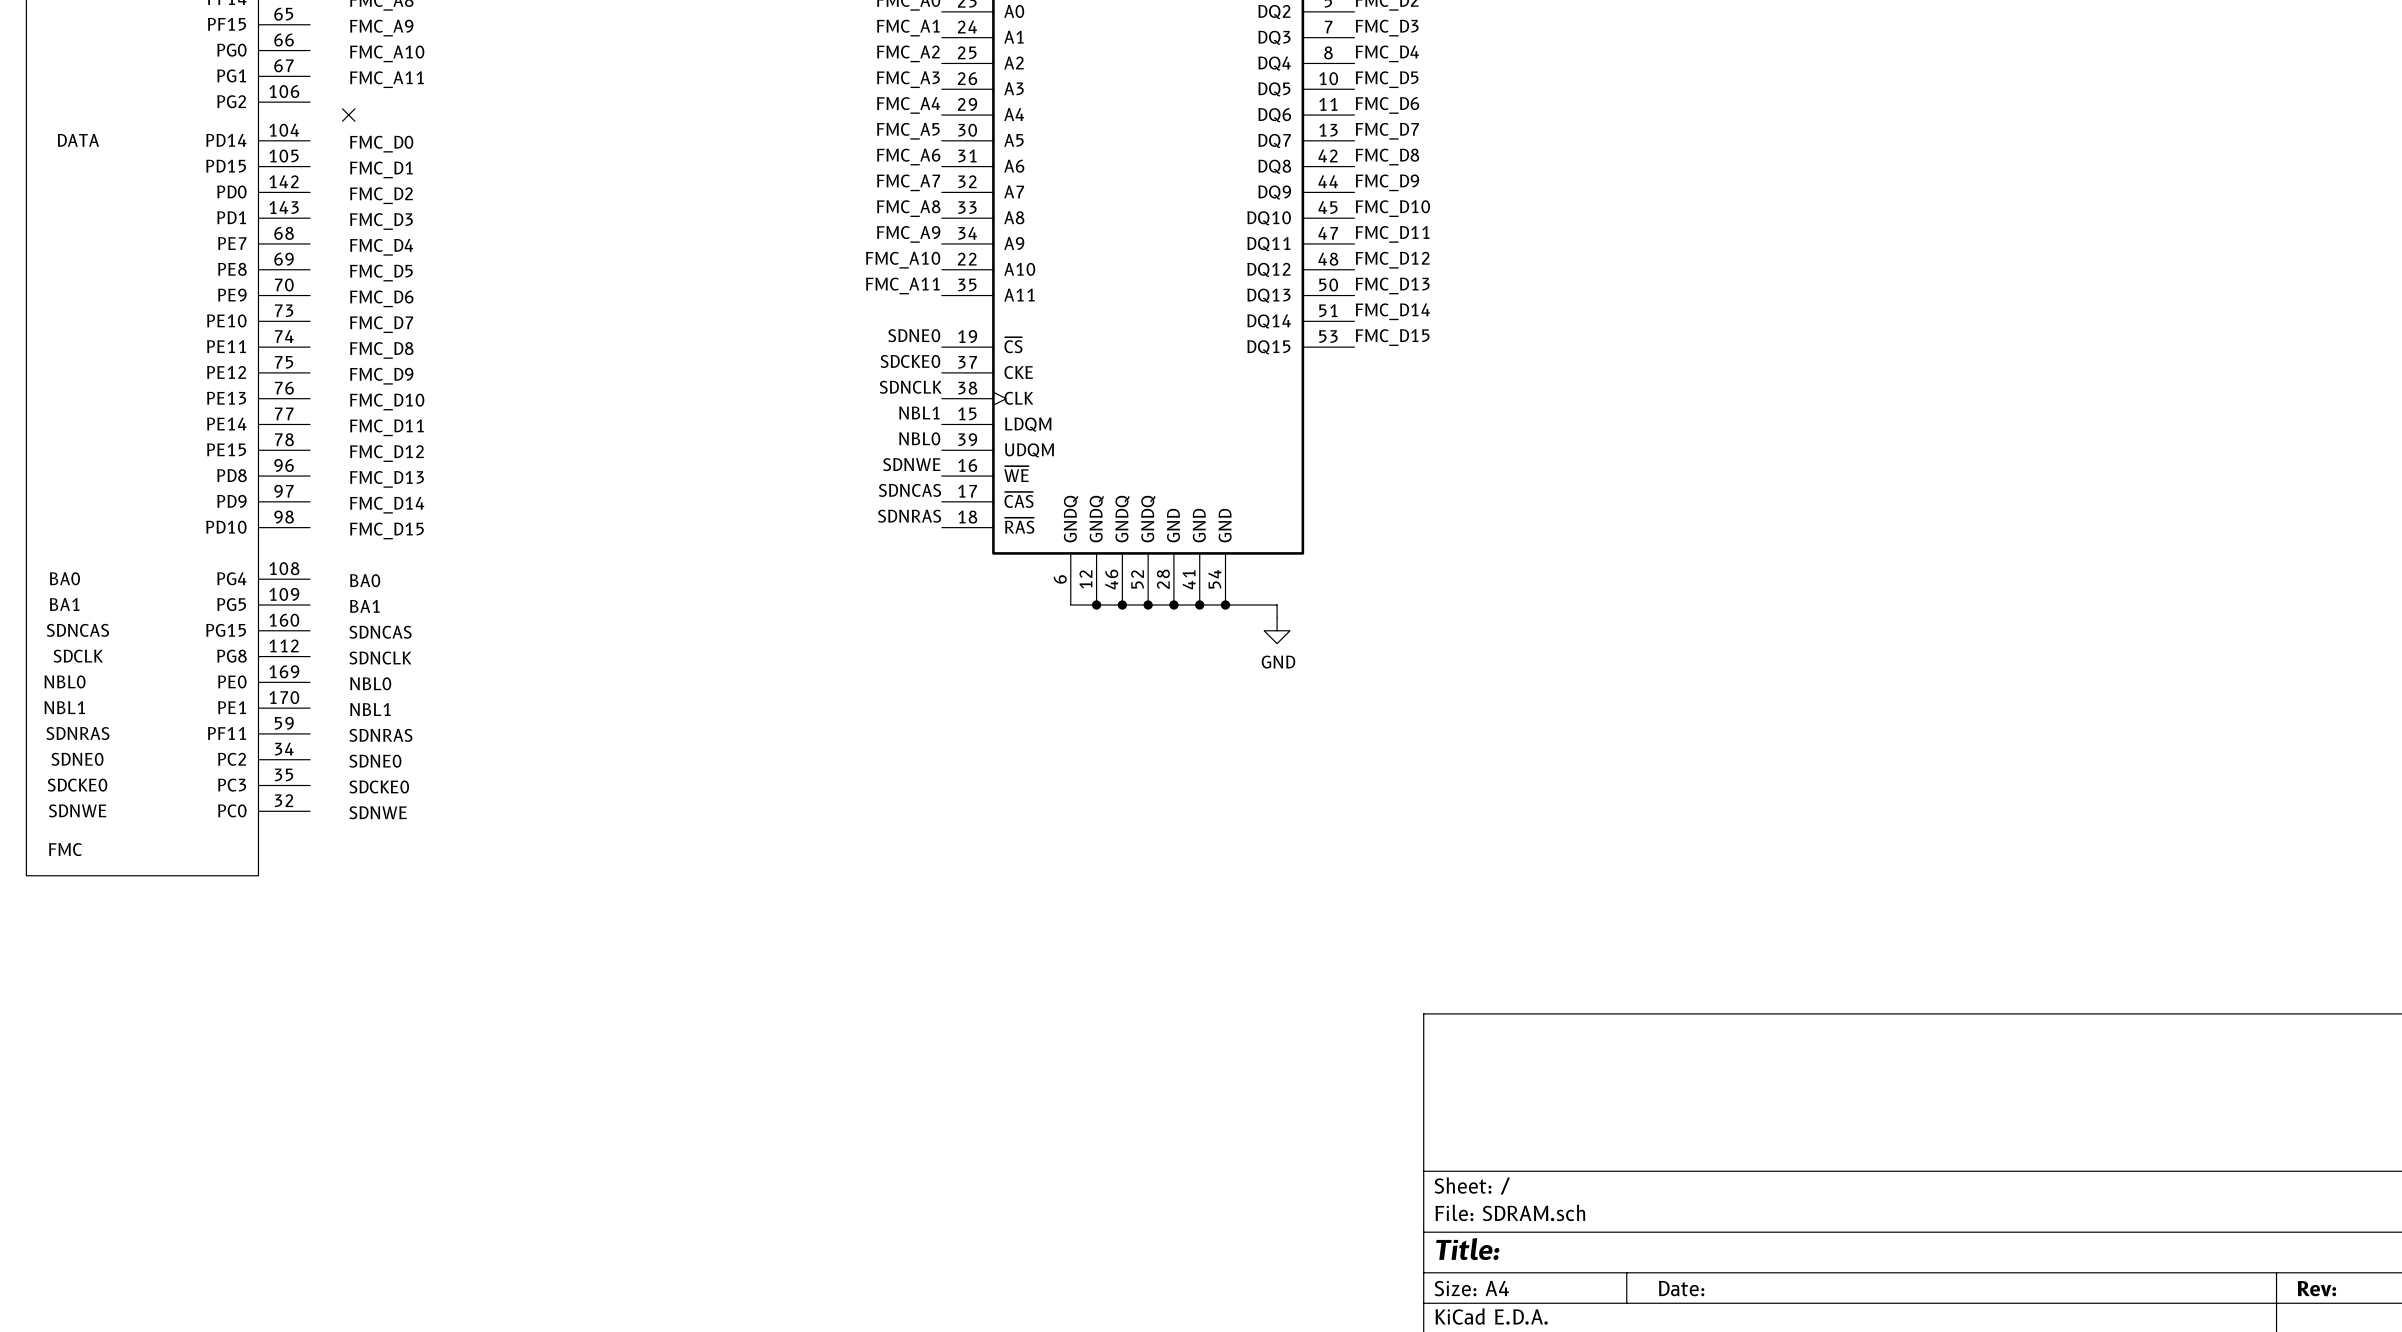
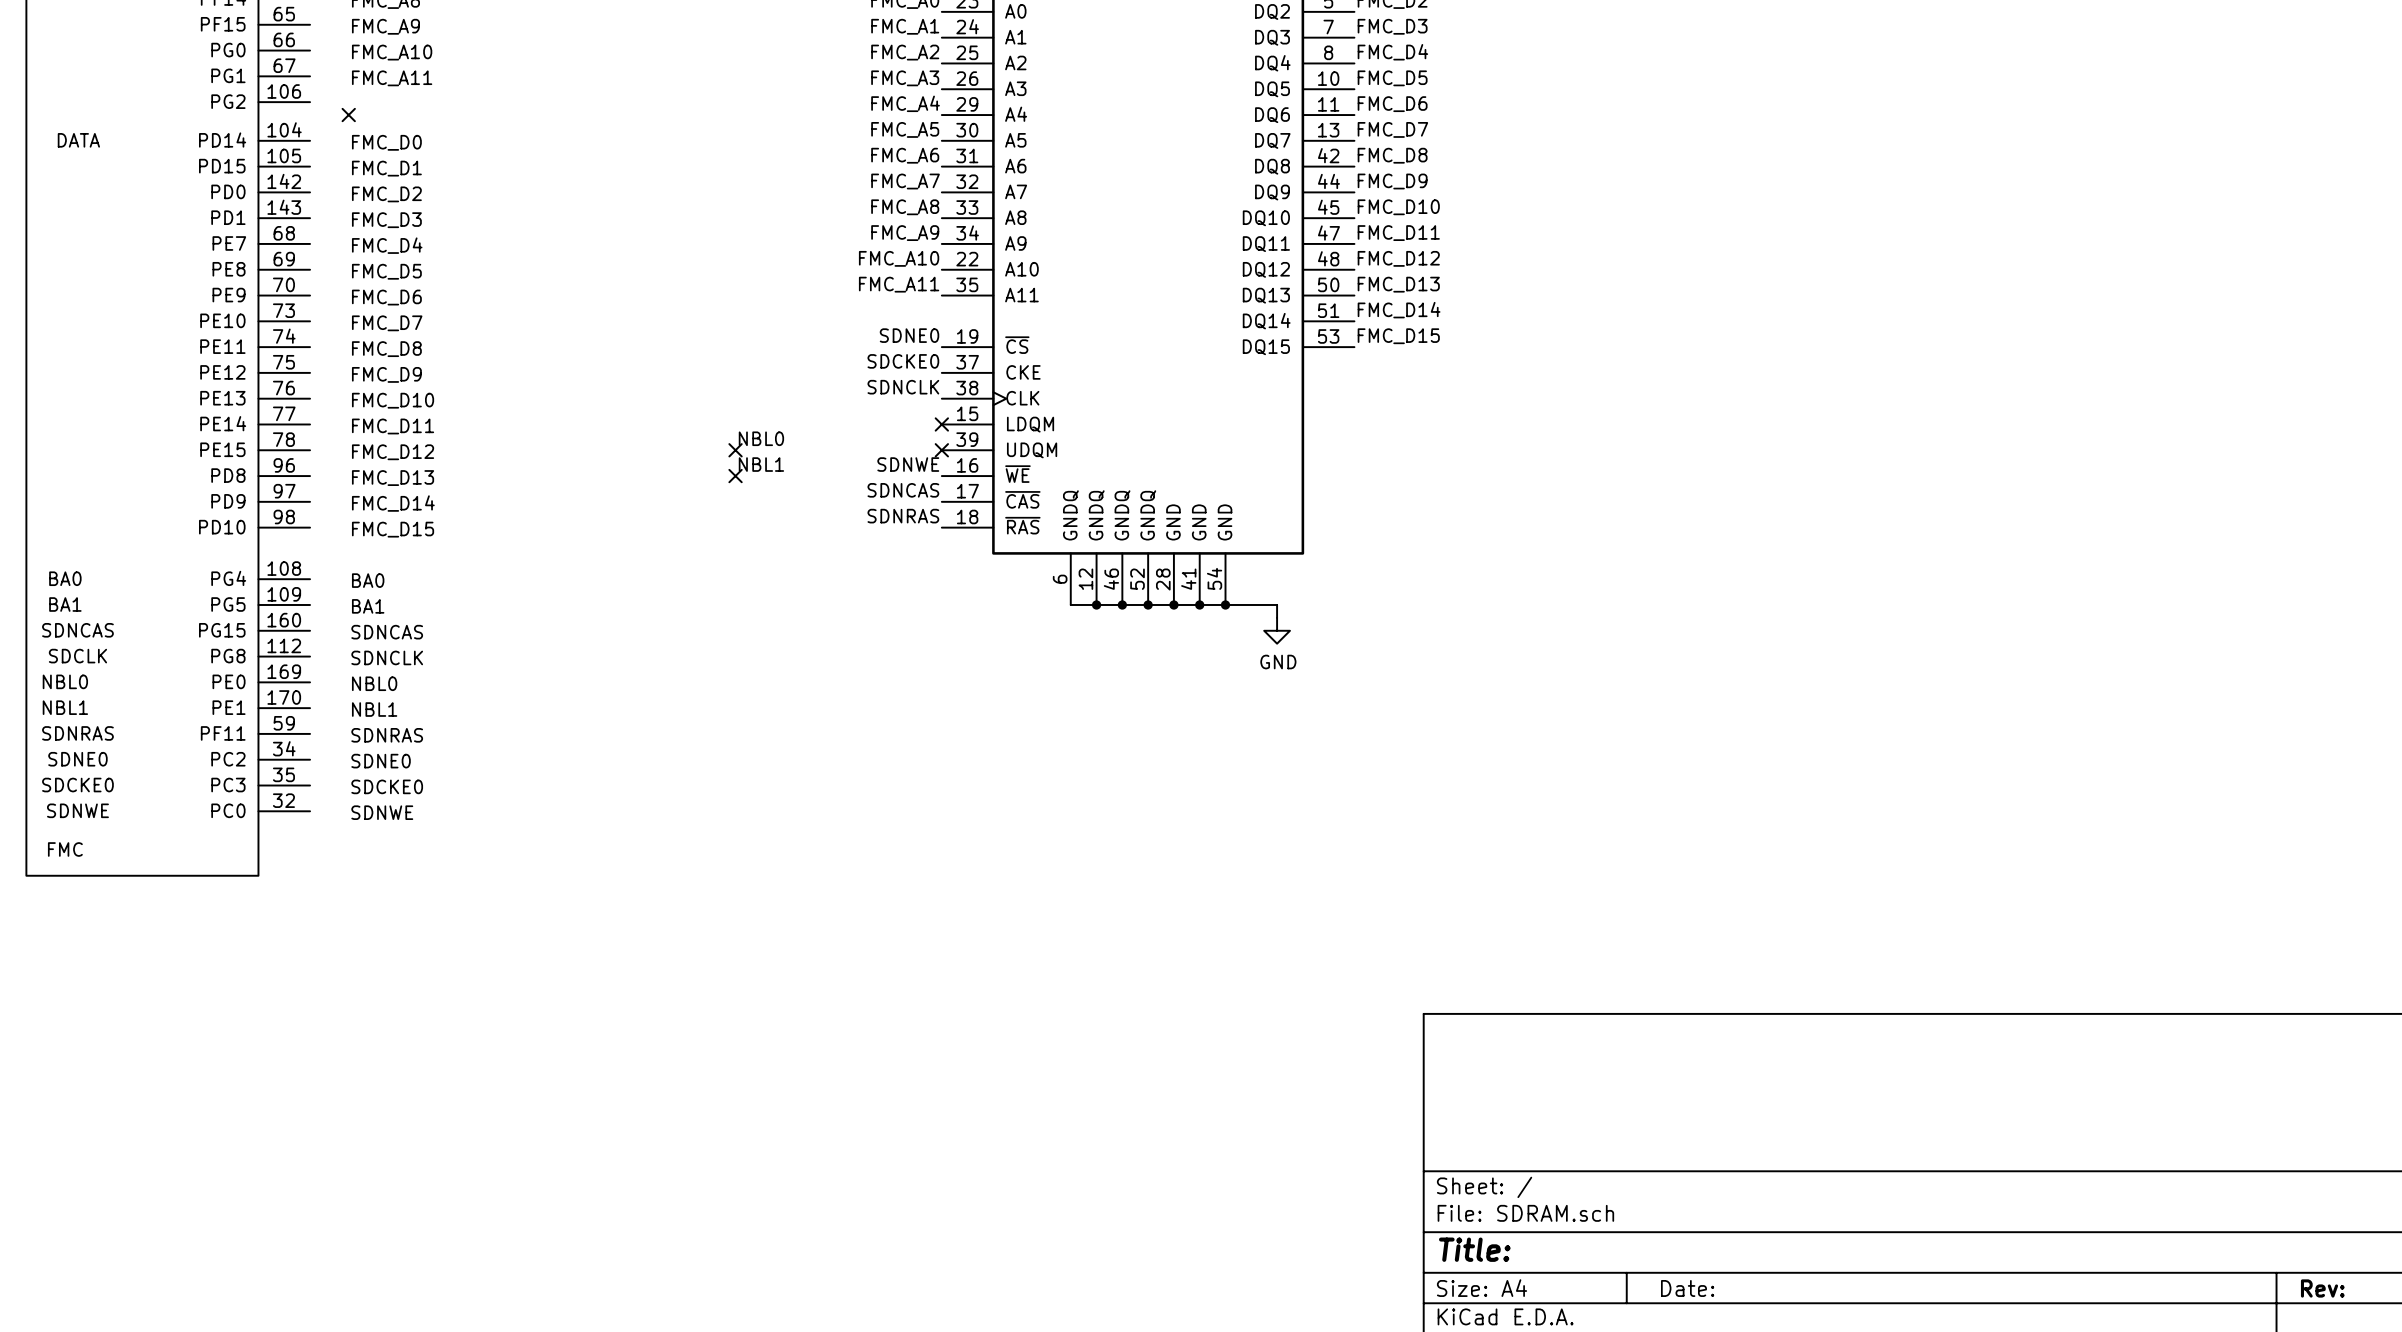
label position: NBL1 (919, 412) -> NBL1 (761, 464)
no-connect mark: none -> (941, 424)
label position: NBL0 (919, 438) -> NBL0 (761, 438)
no-connect mark: none -> (735, 450)
no-connect mark: none -> (941, 450)
no-connect mark: none -> (735, 476)

